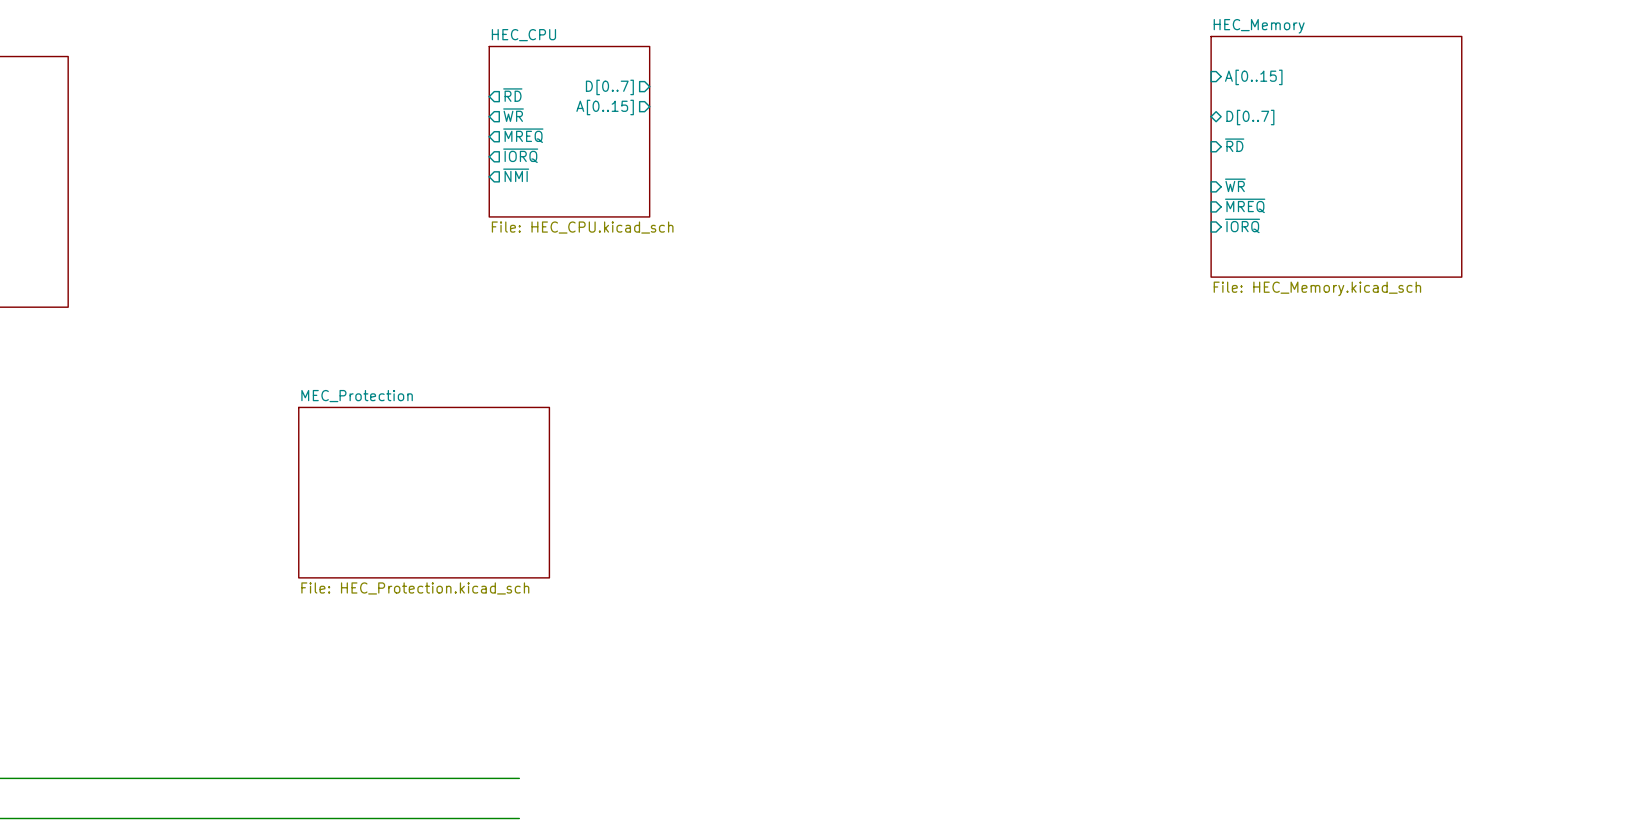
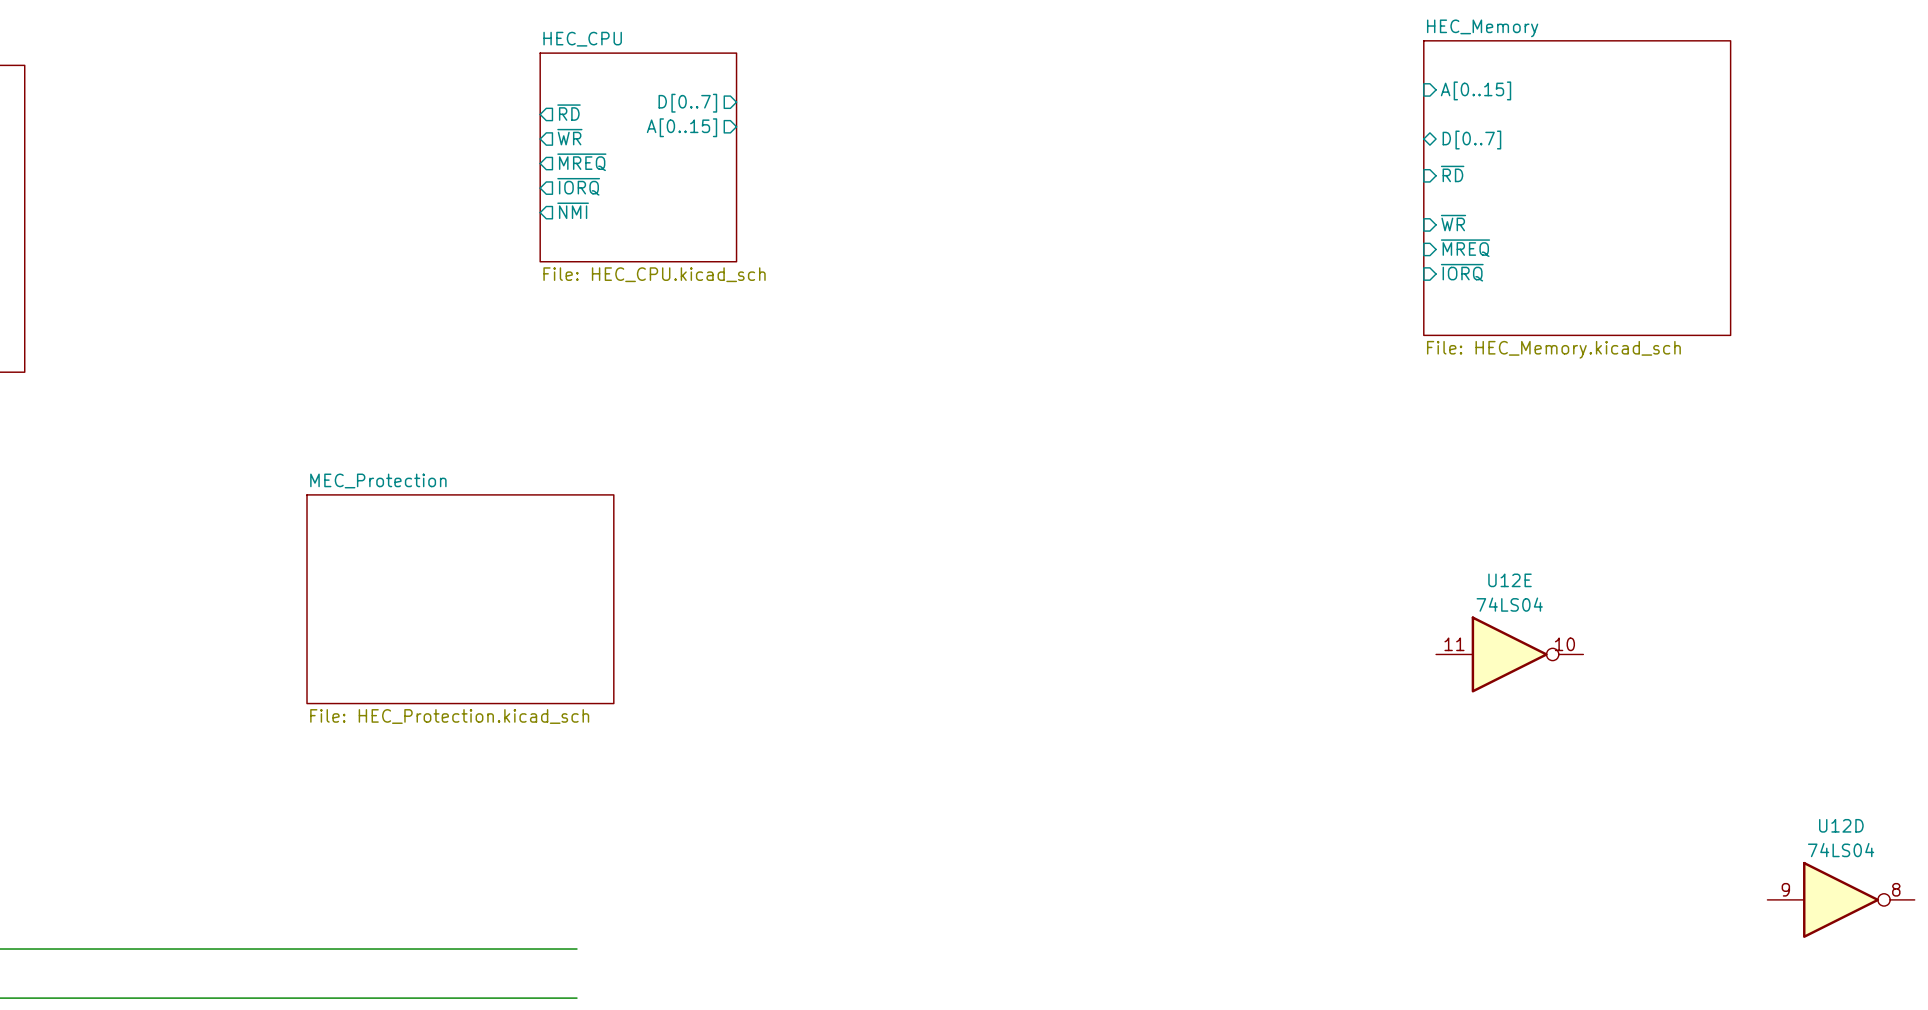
U12E: none -> 74LS04 (1509, 654)
U12D: none -> 74LS04 (1841, 899)

